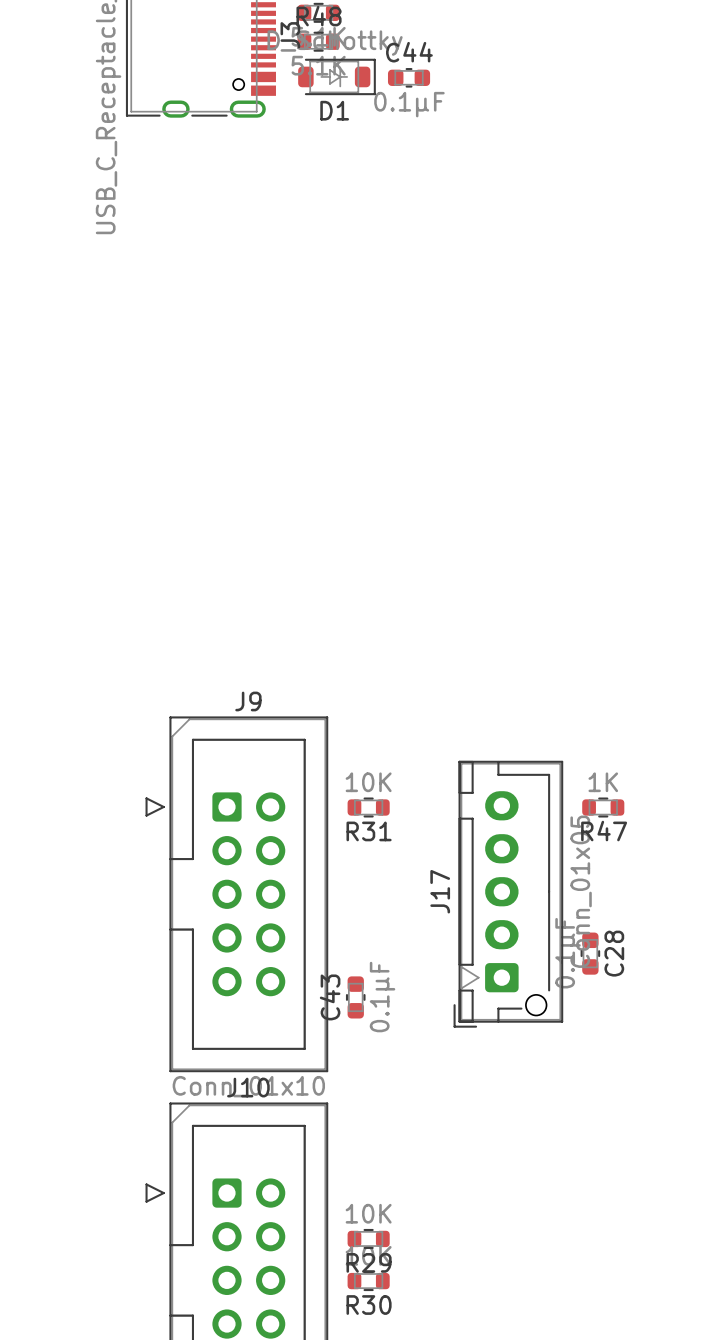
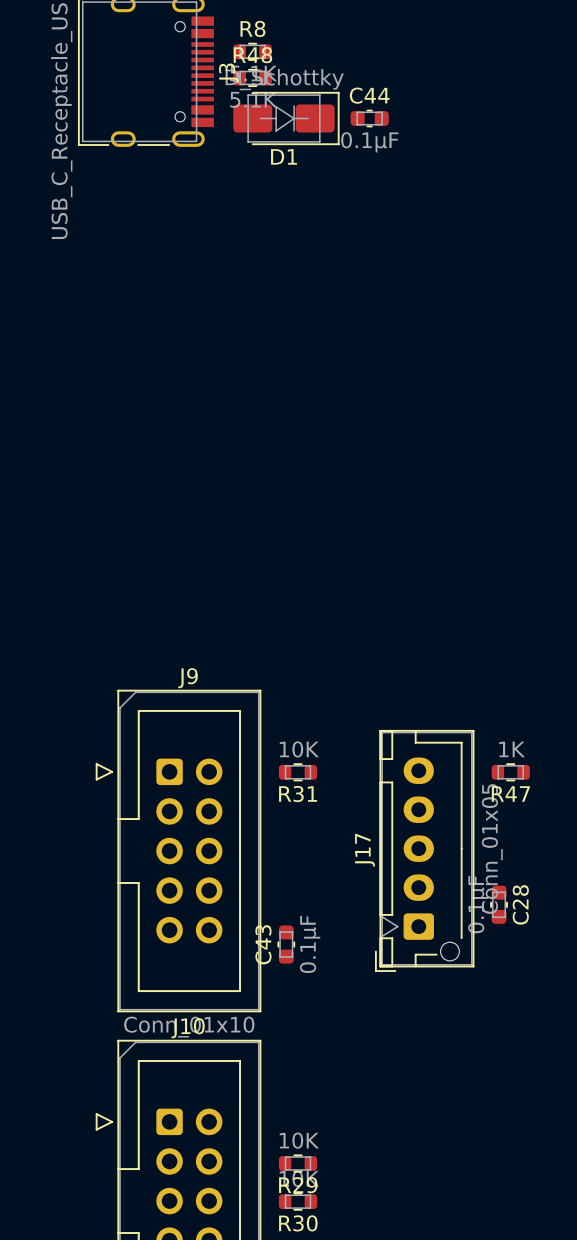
D1 footprint: [298, 58, 376, 96] -> [233, 91, 340, 146]
C44 position: (409, 77) -> (369, 118)

